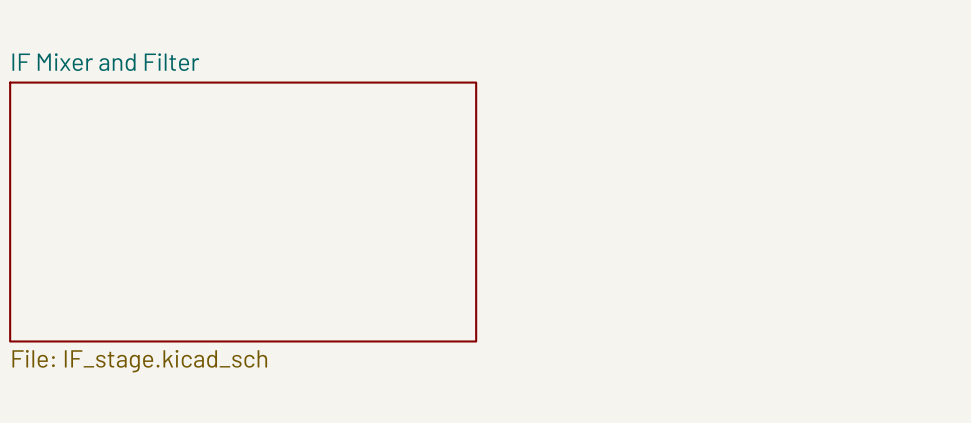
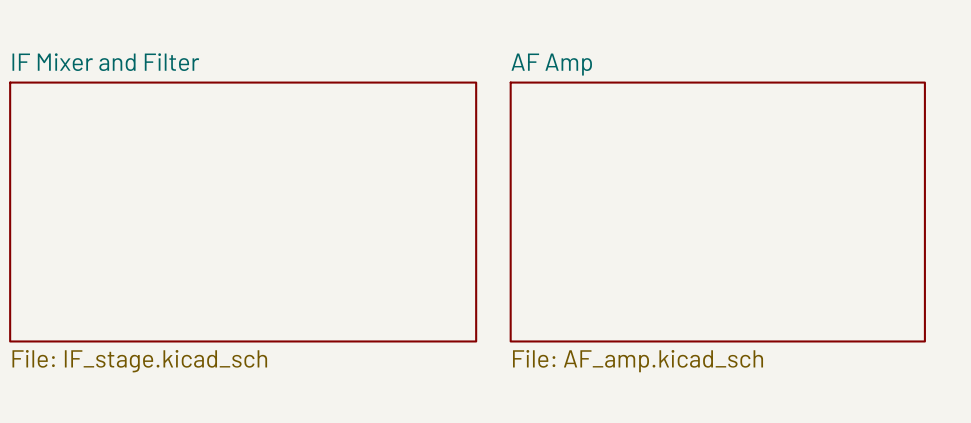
sheet AF Amp: none -> File: AF_amp.kicad_sch (717, 212)

